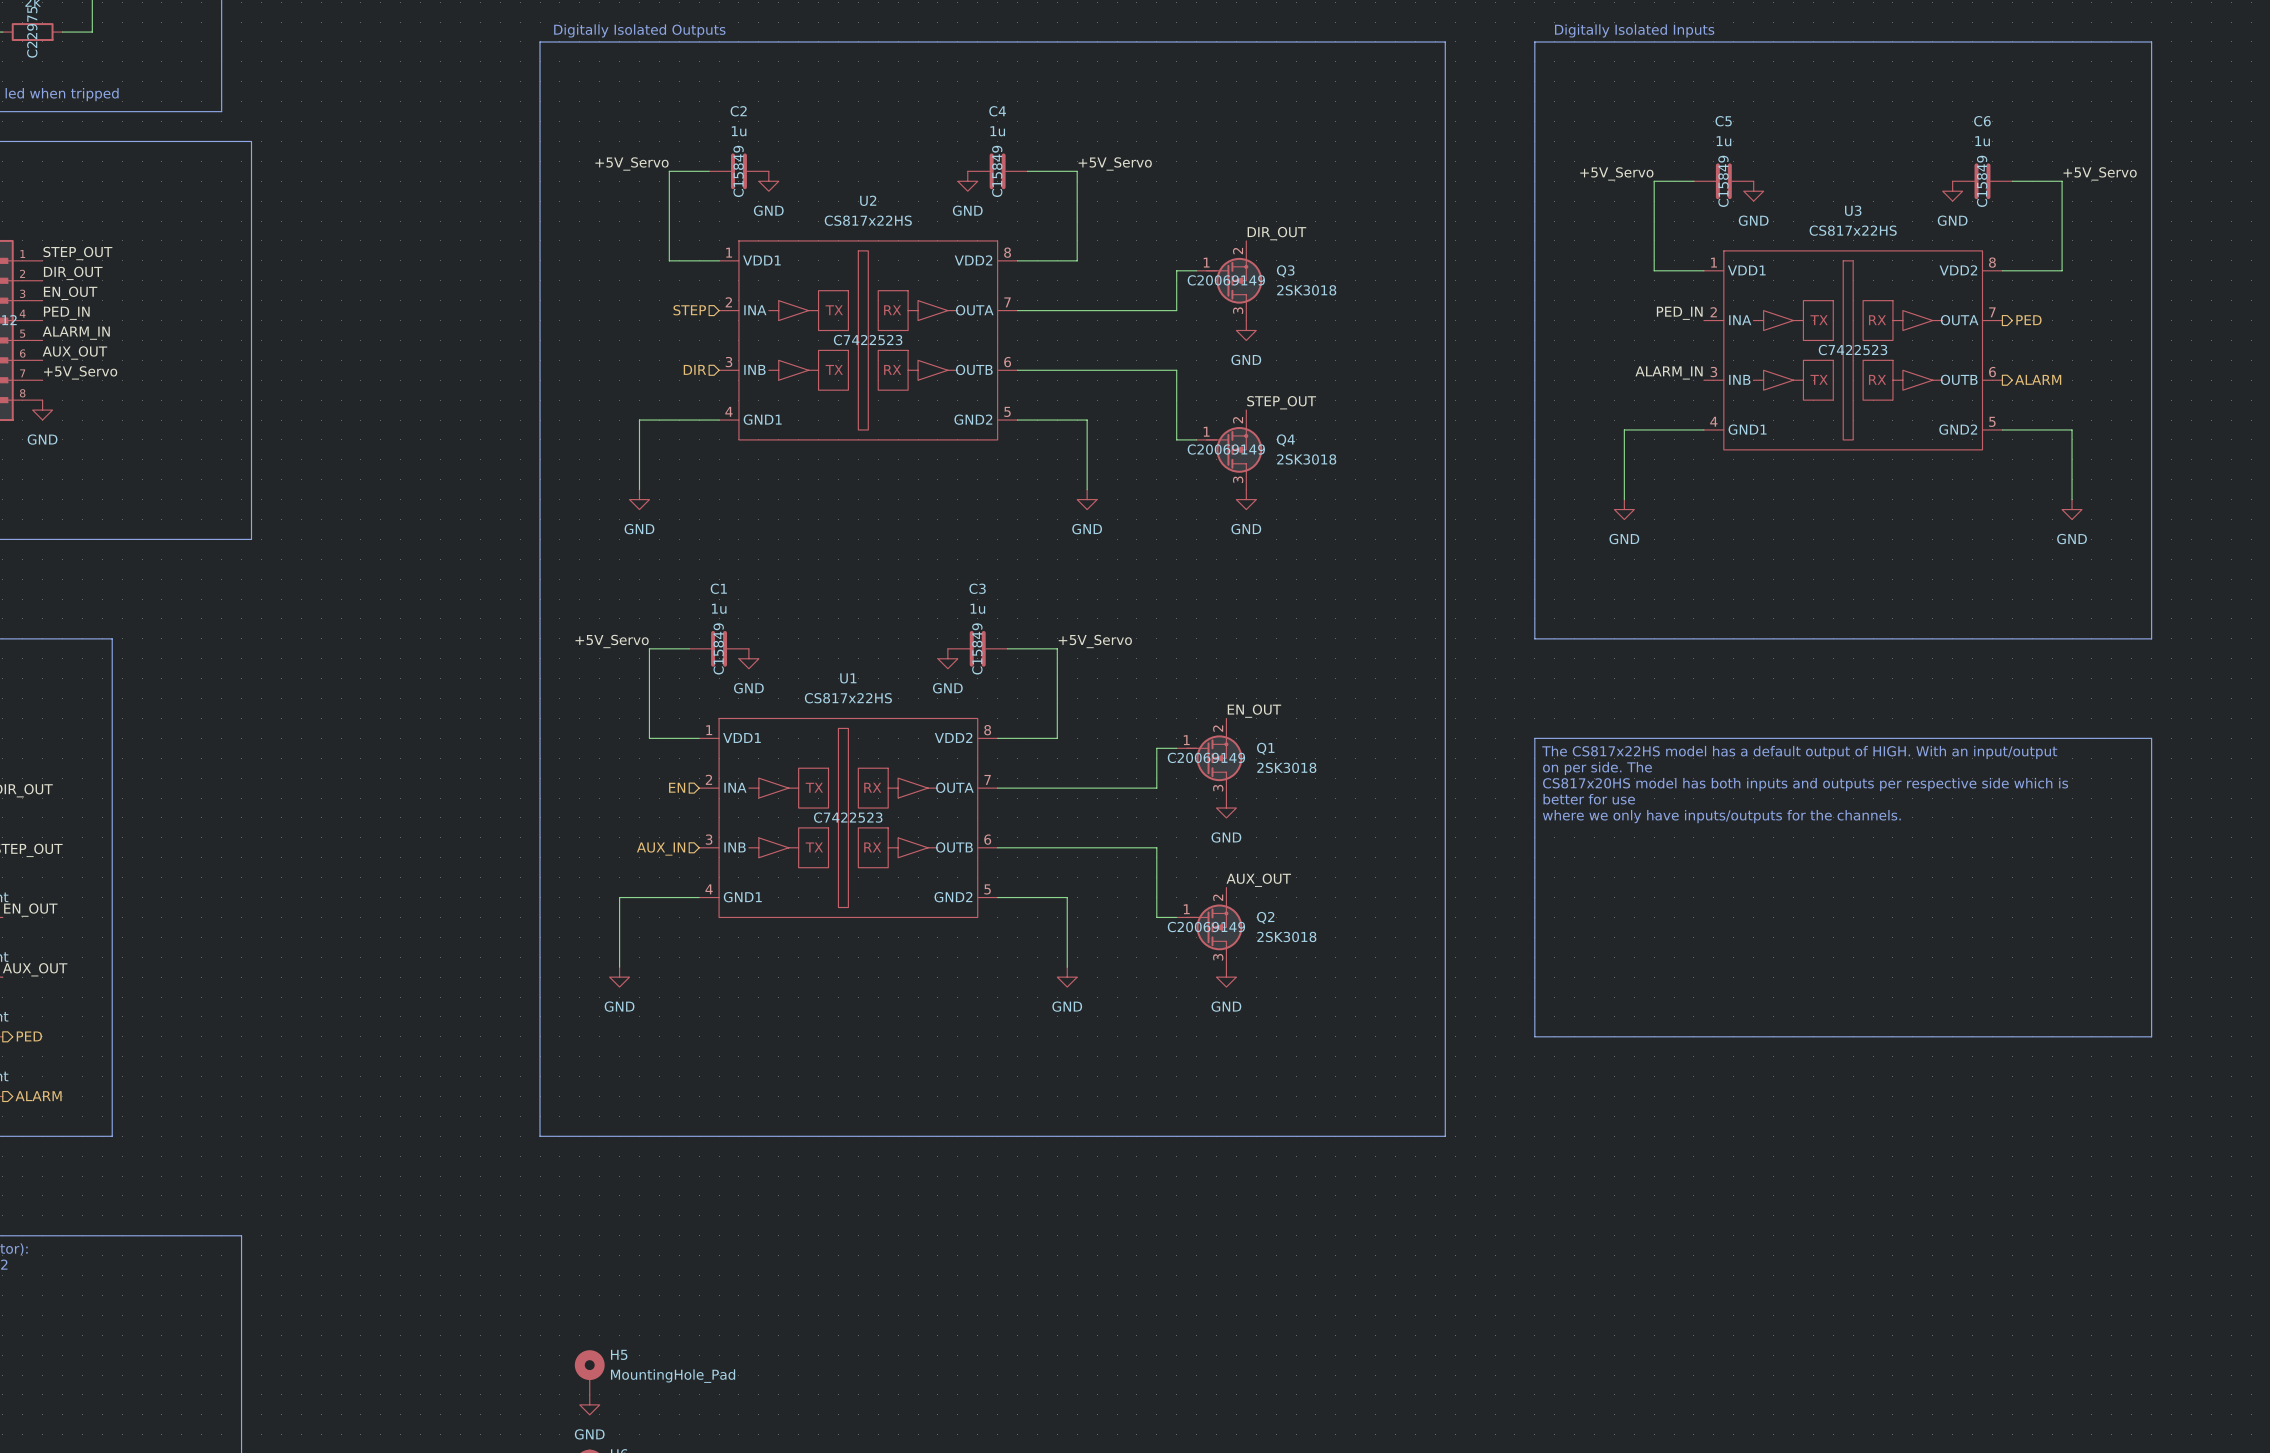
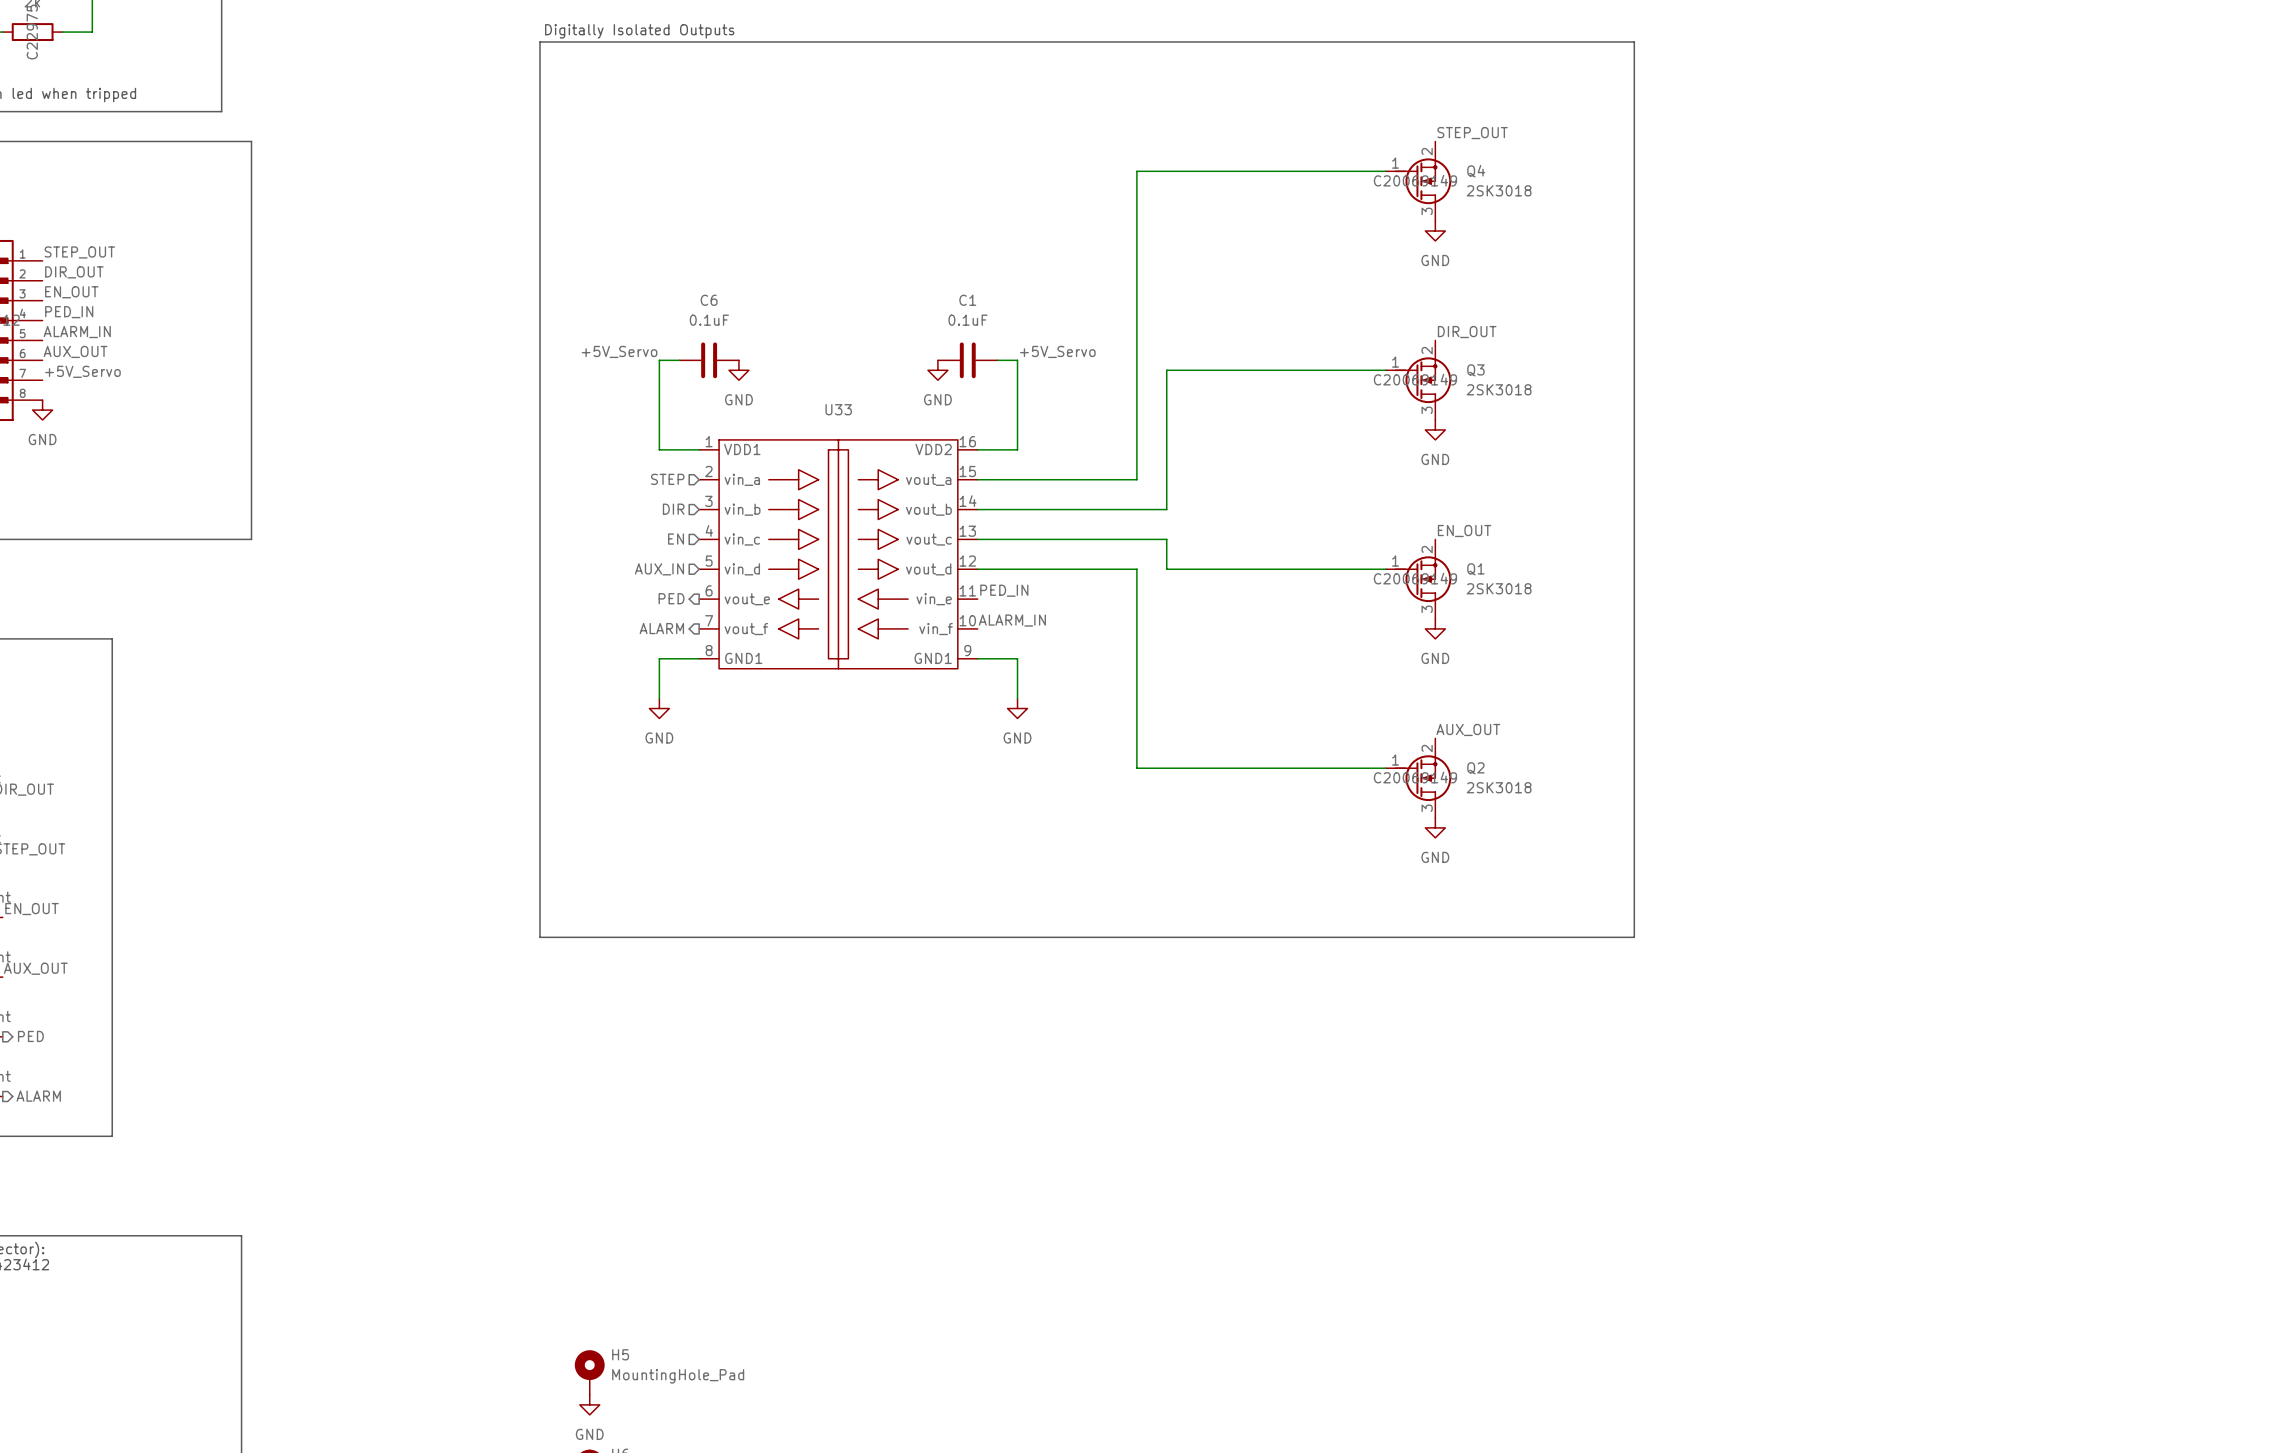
text: Digitally Isolated Inputs (1634, 30) -> none
line: (1445, 41) (1445, 1136) (540, 1136) (540, 937) -> (1634, 41) (1634, 937) (540, 937)
line: (1534, 41) (1534, 638) (2151, 638) (2151, 41) (1634, 41) -> (1534, 41) (1445, 41)
label: none -> STEP_OUT (1472, 133)
C6 value: 1u (1982, 141) -> 0.1uF (709, 320)
label: +5V_Servo (631, 163) -> none
label: +5V_Servo (1115, 163) -> none
wire: (709, 171) (669, 171) (669, 260) (719, 260) -> none
C2: 1u (738, 171) -> none
C4: 1u (997, 171) -> none
wire: (1027, 171) (1077, 171) (1077, 260) (1017, 260) -> none
wire: none -> (1385, 171) (1136, 171) (1136, 479) (977, 479)
label: +5V_Servo (1616, 173) -> none
label: +5V_Servo (2100, 173) -> none
power symbol: GND (768, 181) -> none
power symbol: GND (967, 181) -> none
wire: (1693, 181) (1654, 181) (1654, 270) (1703, 270) -> none
C5: 1u (1723, 181) -> none
C6 position: (1982, 181) -> (709, 360)
C6 text: C15849 (1982, 181) -> none
wire: (2012, 181) (2062, 181) (2062, 270) (2002, 270) -> none
power symbol: GND (1753, 191) -> none
power symbol: GND (1952, 191) -> none
power symbol: none -> GND (1435, 231)
label: DIR_OUT (1276, 233) -> none
wire: (1196, 270) (1176, 270) (1176, 310) (1017, 310) -> none
Q3 position: (1229, 280) -> (1418, 380)
hierarchical label position: STEP (689, 310) -> STEP (667, 479)
label: PED_IN (1679, 313) -> none
hierarchical label: PED (2028, 320) -> none
power symbol: GND (1246, 330) -> none
label: none -> DIR_OUT (1467, 332)
U2: CS817x22HS (868, 340) -> none
U3: CS817x22HS (1853, 350) -> none
label: none -> +5V_Servo (619, 351)
label: none -> +5V_Servo (1057, 351)
wire: none -> (679, 360) (659, 360) (659, 449) (699, 449)
wire: none -> (997, 360) (1017, 360) (1017, 449) (977, 449)
hierarchical label position: DIR (694, 369) -> DIR (673, 509)
power symbol: none -> GND (738, 370)
power symbol: none -> GND (937, 370)
wire: (1017, 370) (1166, 370) -> (977, 509) (1166, 509) (1166, 370)
wire: (1176, 370) (1176, 439) (1196, 439) -> (1176, 370) (1385, 370)
label: ALARM_IN (1669, 372) -> none
hierarchical label: ALARM (2038, 379) -> none
label: STEP_OUT (1281, 402) -> none
wire: (719, 420) (639, 420) (639, 489) -> none
wire: (1017, 420) (1087, 420) (1087, 489) -> none
power symbol: none -> GND (1435, 429)
wire: (1703, 429) (1624, 429) (1624, 499) -> none
wire: (2002, 429) (2072, 429) (2072, 499) -> none
Q4 position: (1229, 449) -> (1418, 181)
power symbol: GND (639, 499) -> none
power symbol: GND (1087, 499) -> none
power symbol: GND (1246, 499) -> none
power symbol: GND (1624, 509) -> none
power symbol: GND (2072, 509) -> none
label: none -> EN_OUT (1464, 531)
hierarchical label: none -> EN (676, 539)
wire: none -> (977, 539) (1166, 539) (1166, 569) (1385, 569)
U33: none -> (838, 554)
wire: none -> (977, 569) (1136, 569) (1136, 768) (1385, 768)
hierarchical label: none -> AUX_IN (659, 569)
label: none -> PED_IN (1004, 590)
hierarchical label: none -> PED (671, 598)
C1 value: 1u (719, 608) -> 0.1uF (968, 320)
label: none -> ALARM_IN (1012, 620)
hierarchical label: none -> ALARM (661, 628)
power symbol: none -> GND (1435, 628)
label: +5V_Servo (612, 641) -> none
label: +5V_Servo (1095, 641) -> none
wire: (689, 648) (649, 648) (649, 738) (699, 738) -> none
C1 text: C15849 (718, 648) -> none
C1 position: (719, 648) -> (967, 360)
C3: 1u (977, 648) -> none
wire: (1007, 648) (1057, 648) (1057, 738) (997, 738) -> none
wire: none -> (699, 658) (659, 658) (659, 698)
power symbol position: GND (748, 658) -> GND (659, 708)
power symbol position: GND (947, 658) -> GND (1017, 708)
wire: none -> (977, 658) (1017, 658) (1017, 698)
label: EN_OUT (1254, 711) -> none
label: none -> AUX_OUT (1468, 729)
line: (1534, 738) (1534, 1036) (2151, 1036) (2151, 738) (1534, 738) -> none
wire: (1176, 748) (1156, 748) (1156, 788) (997, 788) -> none
text: The CS817x22HS model has a default output of HIGH. With an input/output (1799, 752) -> none
Q1 position: (1209, 758) -> (1418, 579)
text: on per side. The (1597, 768) -> none
text: CS817x20HS model has both inputs and outputs per respective side which is (1805, 784) -> none
hierarchical label: EN (677, 787) -> none
text: better for use (1589, 799) -> none
power symbol: GND (1226, 808) -> none
text: where we only have inputs/outputs for the channels. (1721, 816) -> none
U1: CS817x22HS (848, 817) -> none
power symbol: none -> GND (1435, 827)
wire: (997, 847) (1156, 847) (1156, 917) (1176, 917) -> none
hierarchical label: AUX_IN (661, 849) -> none
label: AUX_OUT (1258, 880) -> none
wire: (699, 897) (619, 897) (619, 967) -> none
wire: (997, 897) (1067, 897) (1067, 967) -> none
Q2 position: (1209, 927) -> (1418, 778)
power symbol: GND (619, 977) -> none
power symbol: GND (1067, 977) -> none
power symbol: GND (1226, 977) -> none

